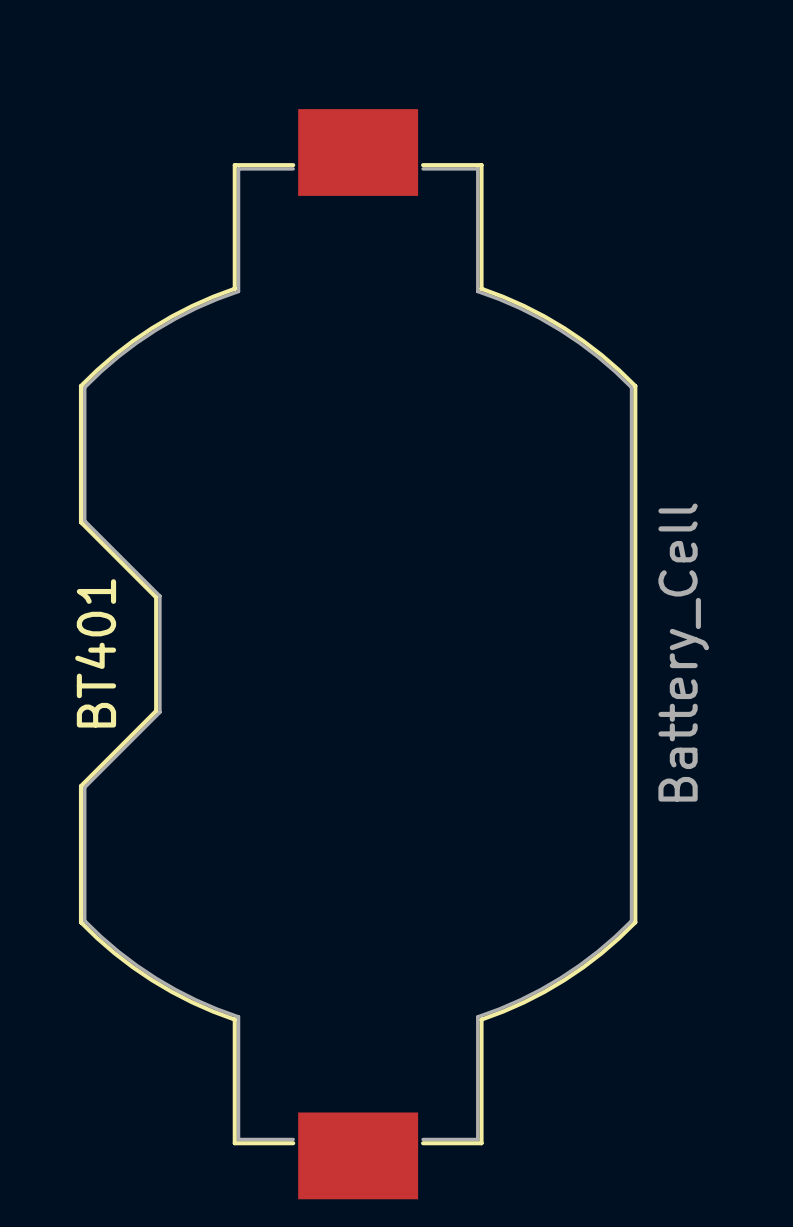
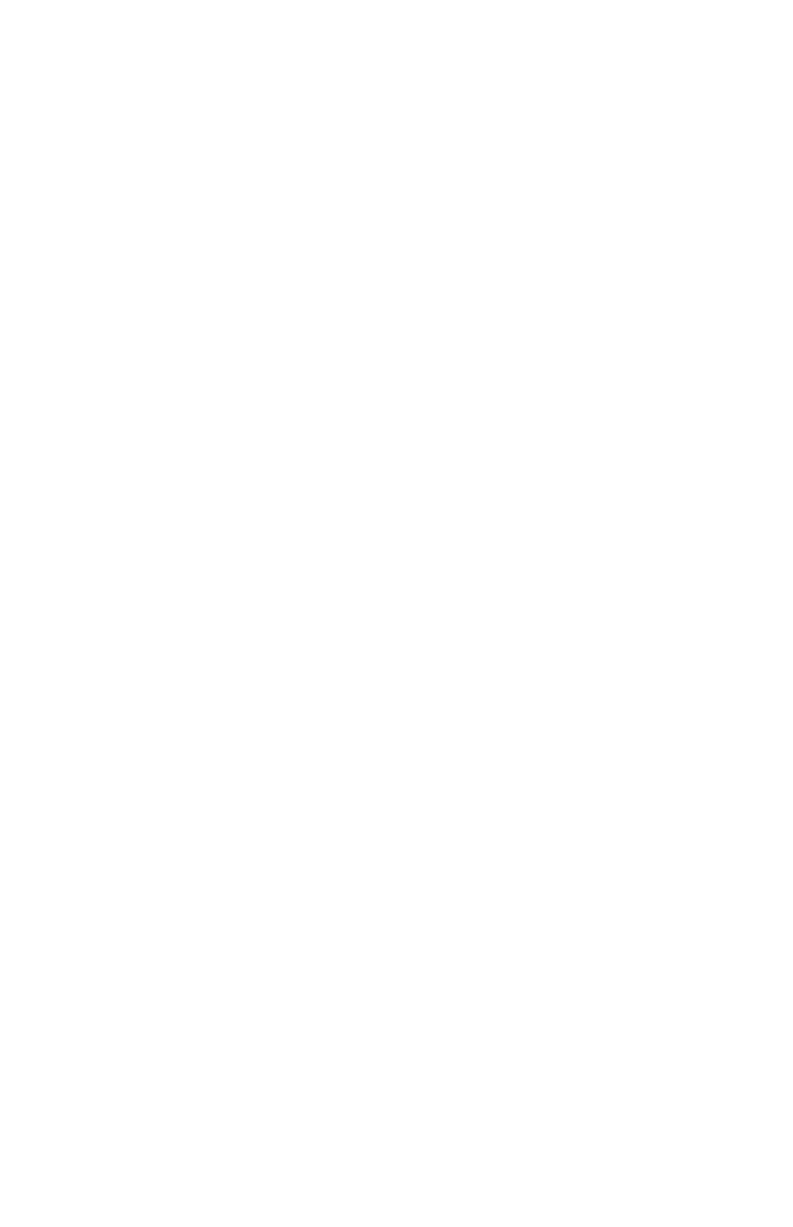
BT401: Battery_Cell (358, 654) -> none

